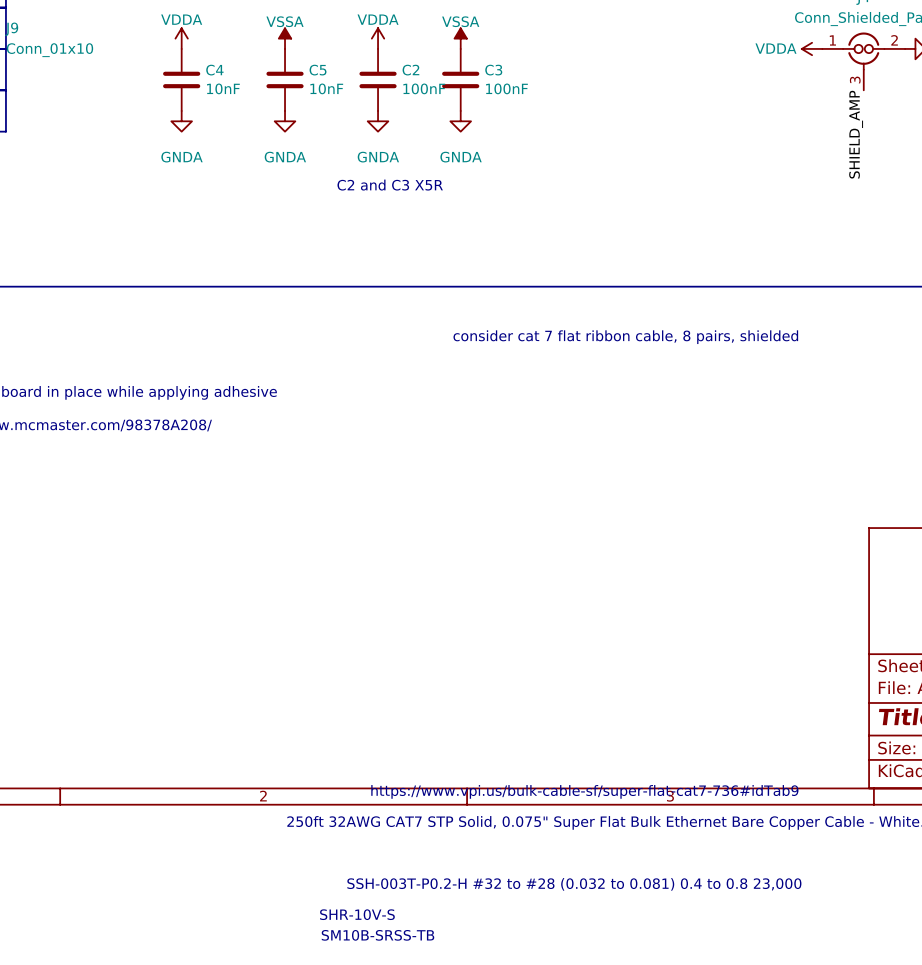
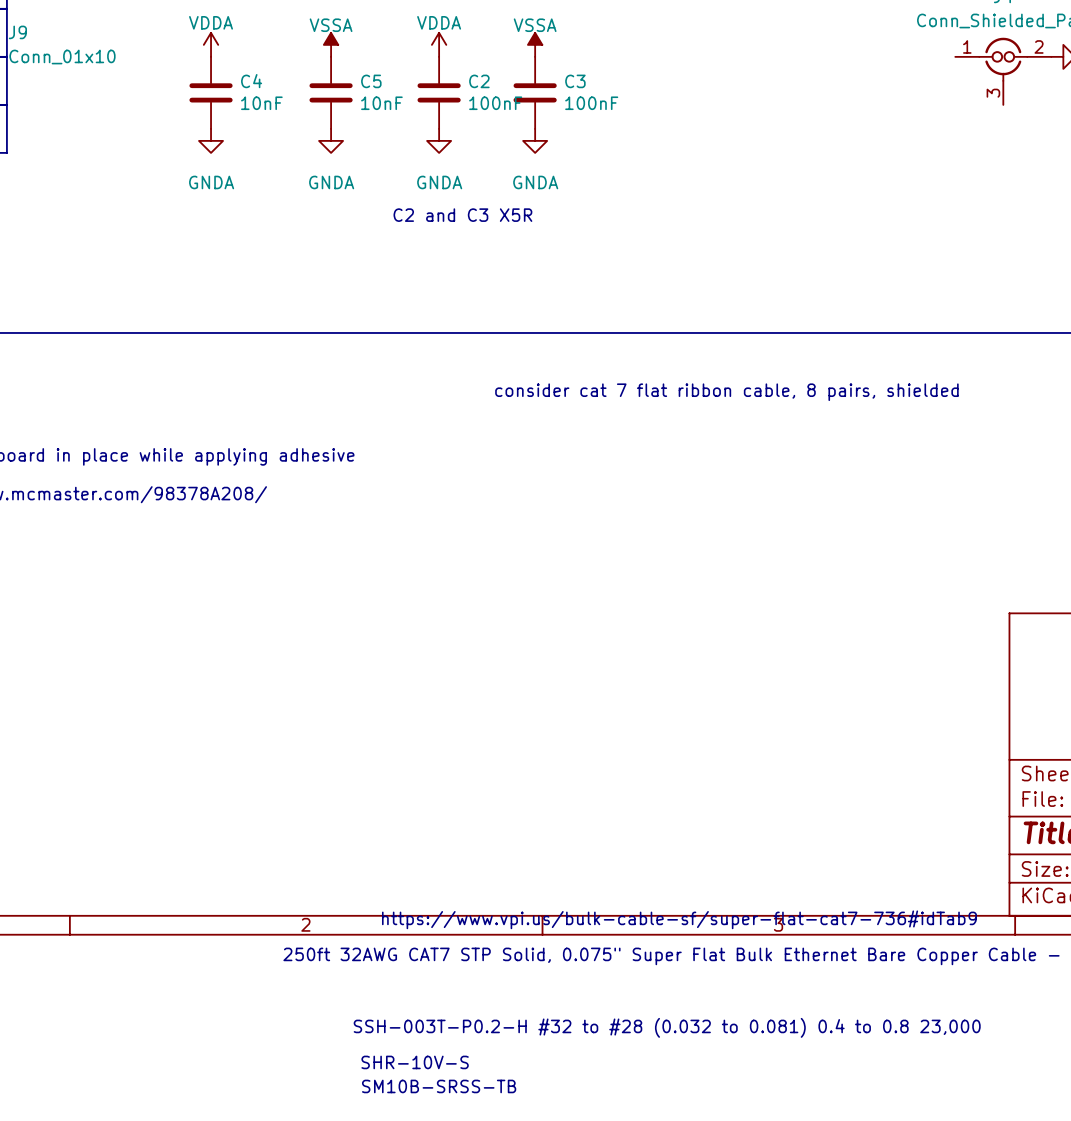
power symbol: VDDA (812, 48) -> none
label: SHIELD_AMP (856, 134) -> none

